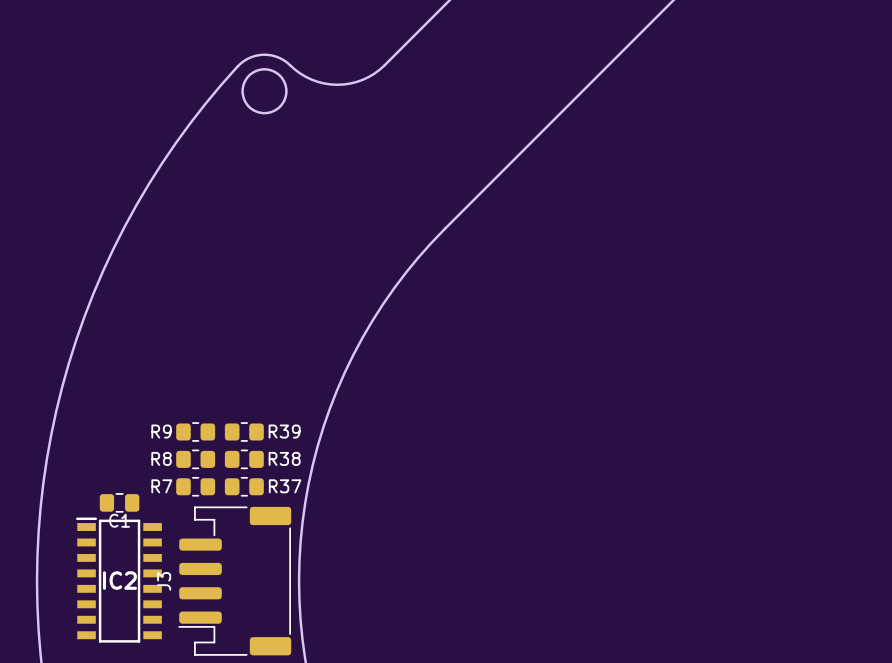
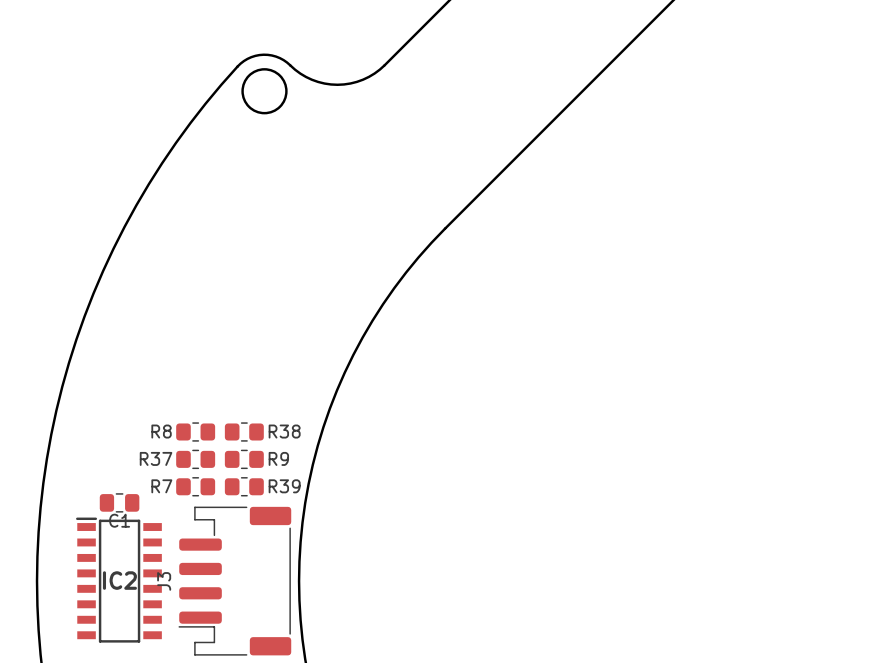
R9 name: R9 (161, 431) -> R8 (161, 431)
R39 name: R39 (284, 431) -> R38 (284, 431)
R8 name: R8 (161, 458) -> R37 (156, 458)
R38 name: R38 (284, 458) -> R9 (278, 458)
R37 name: R37 (285, 486) -> R39 (284, 486)

